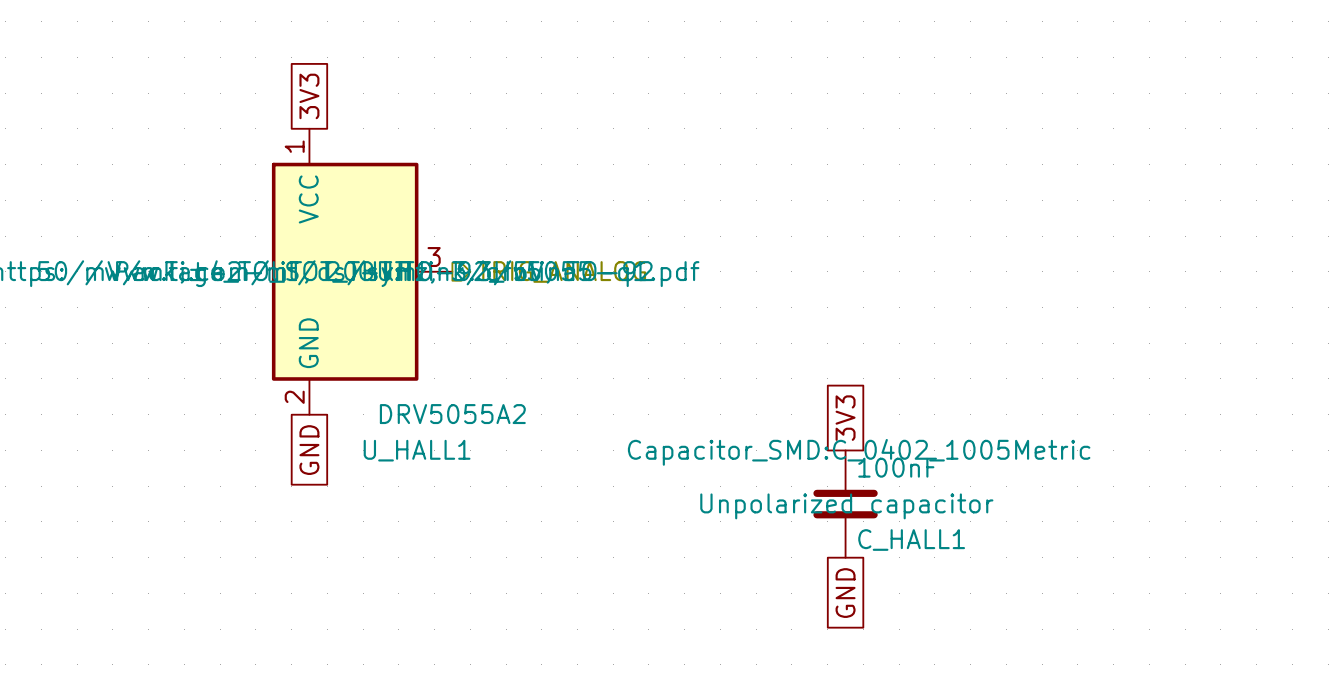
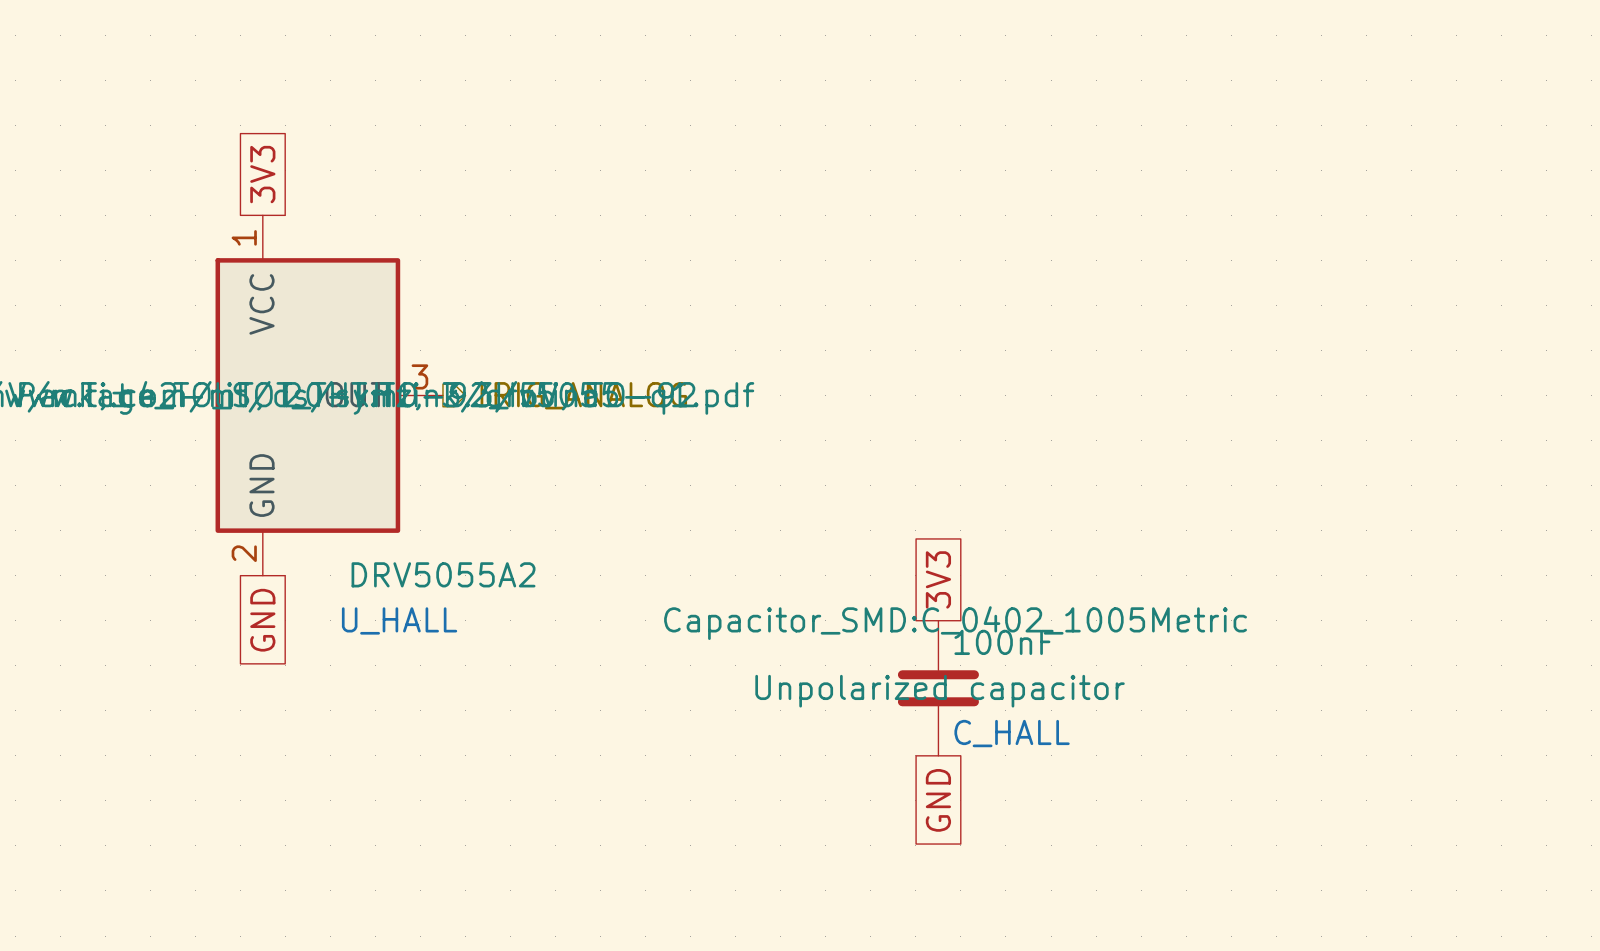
U_HALL1 name: U_HALL1 (417, 450) -> U_HALL (399, 620)
C_HALL1 name: C_HALL1 (911, 540) -> C_HALL (1012, 733)

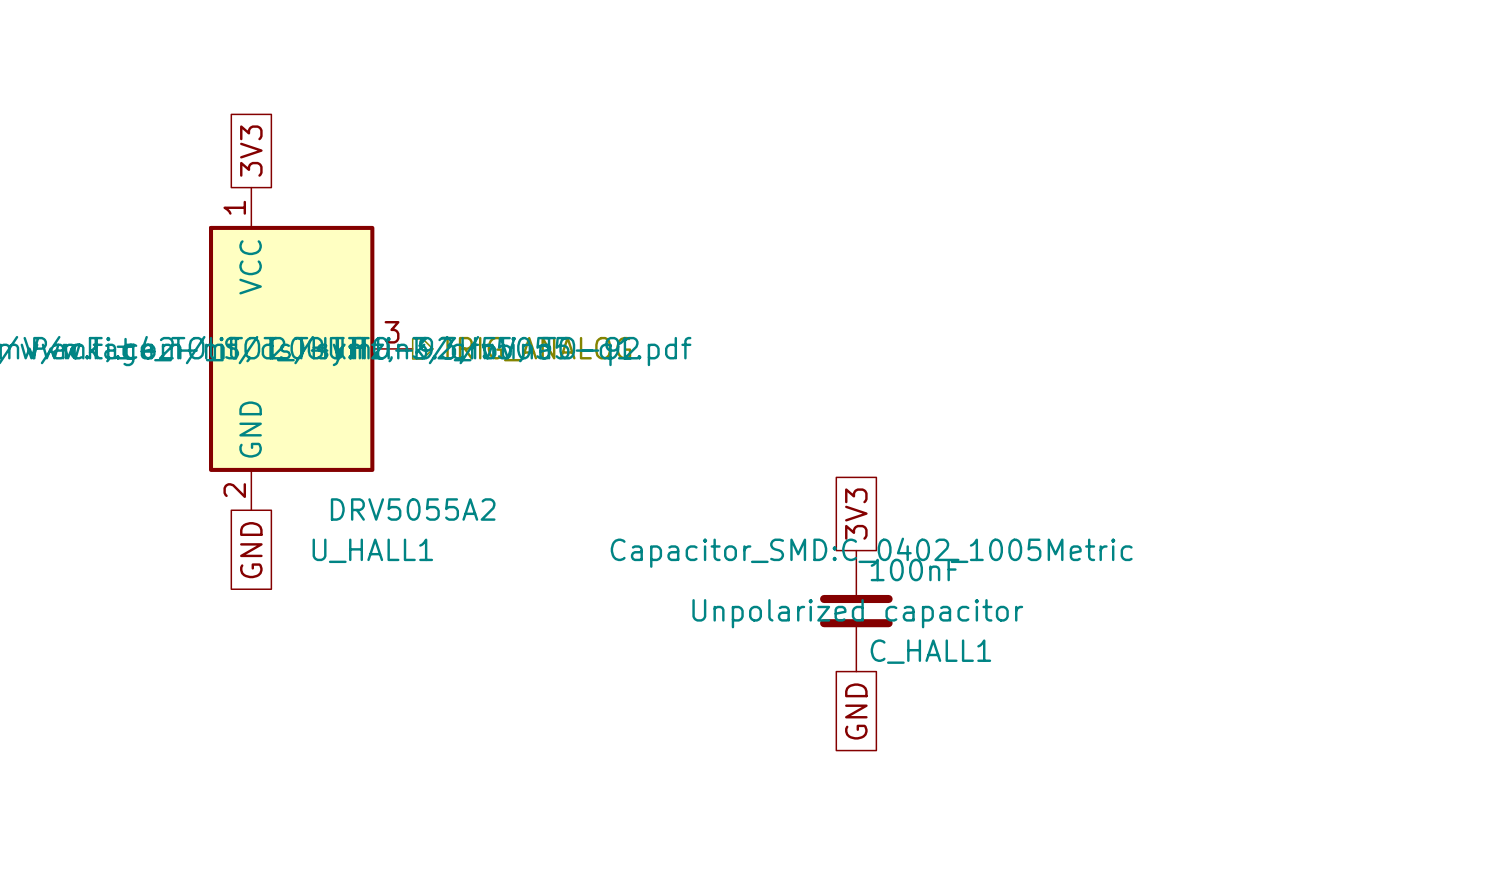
U_HALL name: U_HALL (399, 620) -> U_HALL1 (372, 550)
C_HALL name: C_HALL (1012, 733) -> C_HALL1 (930, 651)

